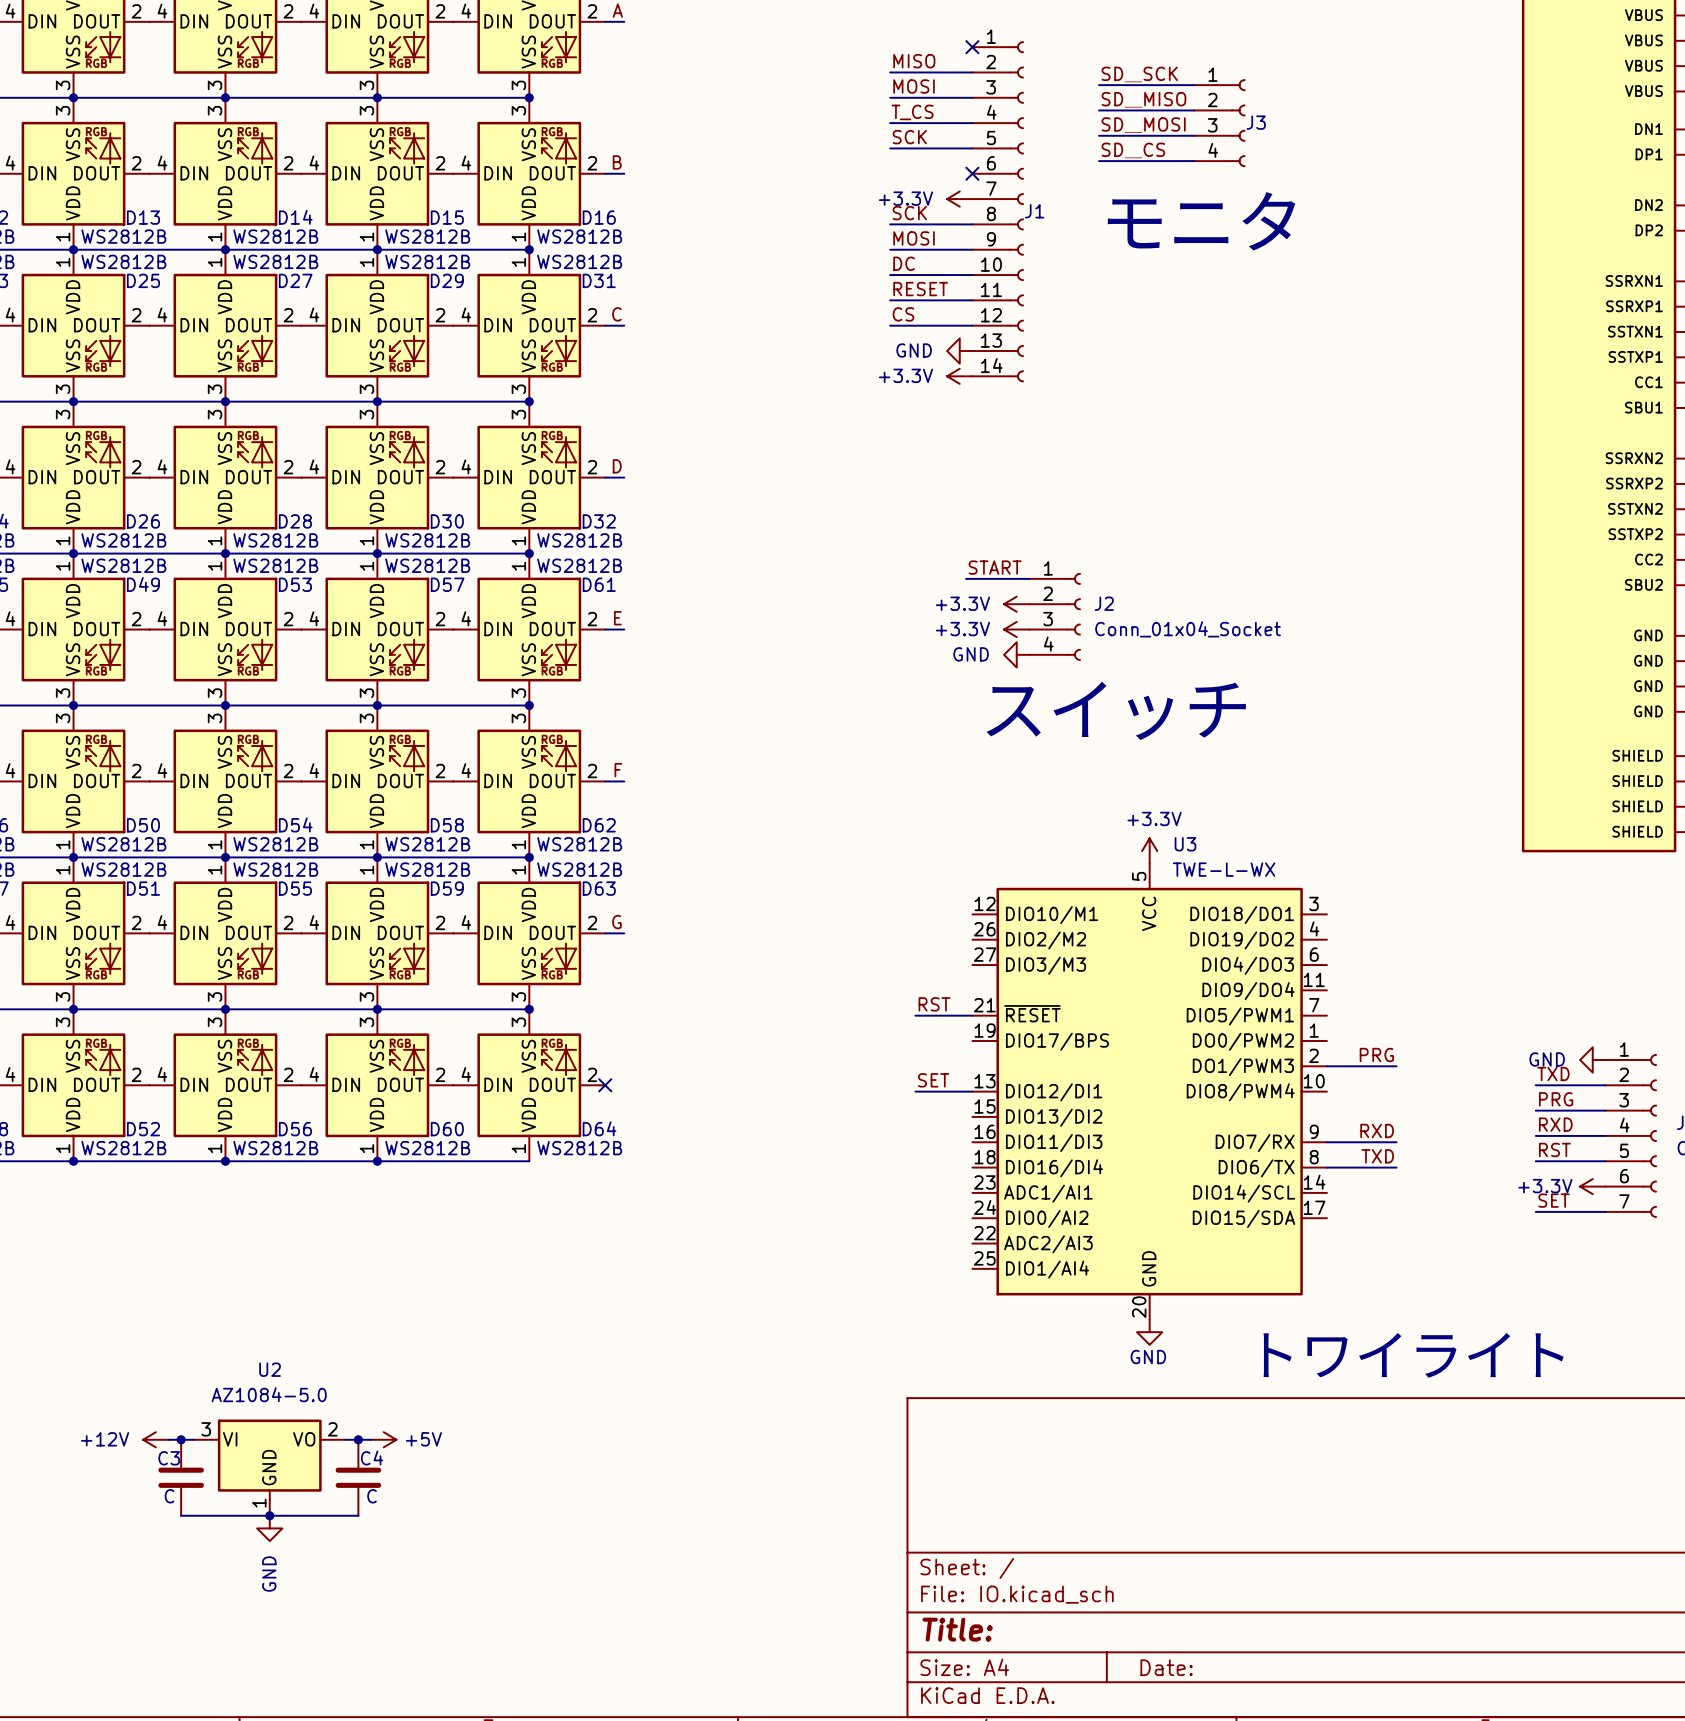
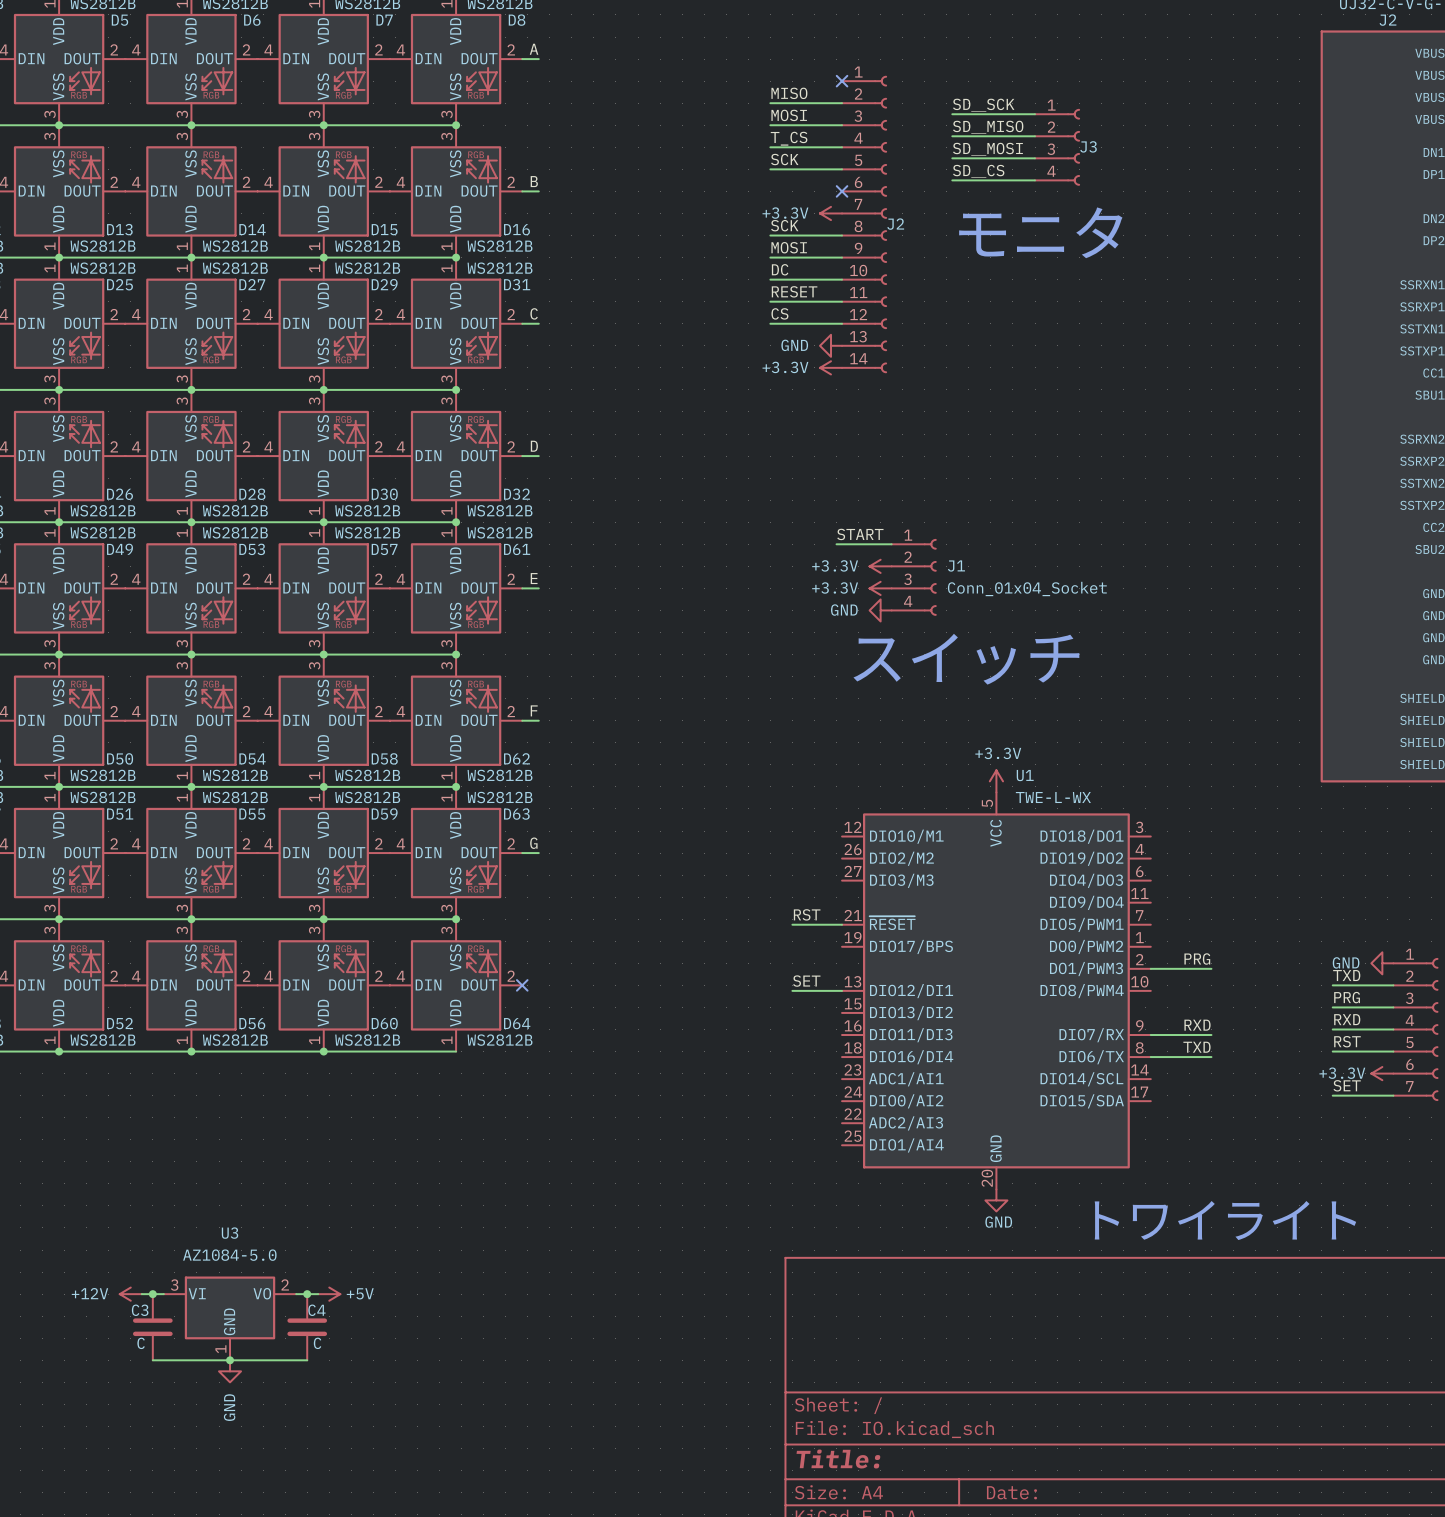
J1 name: J1 (1034, 211) -> J2 (895, 224)
J2 name: J2 (1104, 603) -> J1 (956, 566)
U3 name: U3 (1185, 844) -> U1 (1025, 775)
U2 name: U2 (270, 1369) -> U3 (230, 1233)

